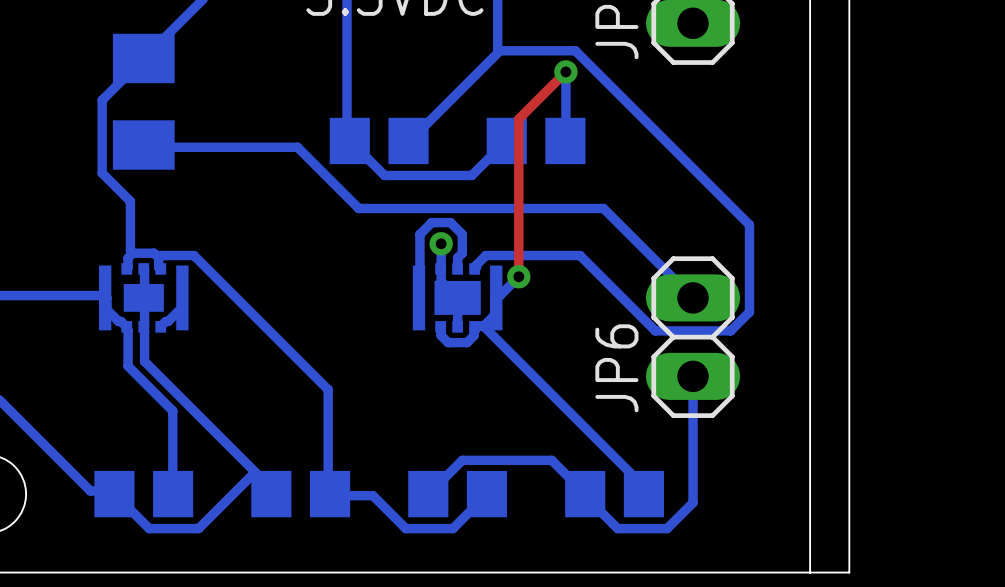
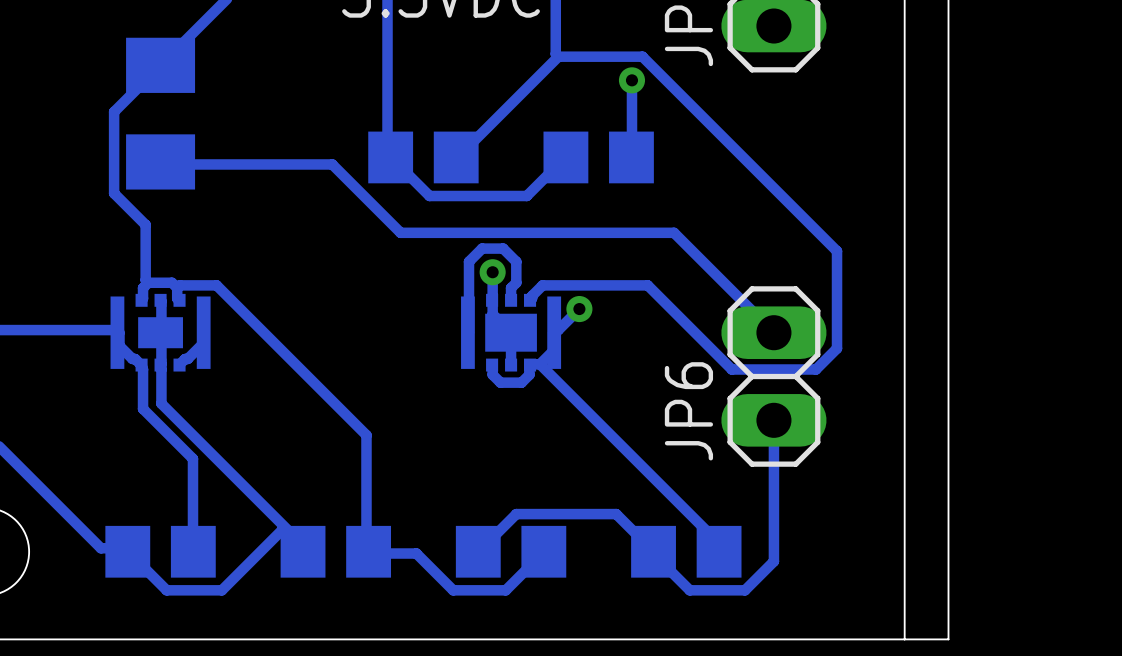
top track: (565, 71) (518, 119) (518, 276) -> none

